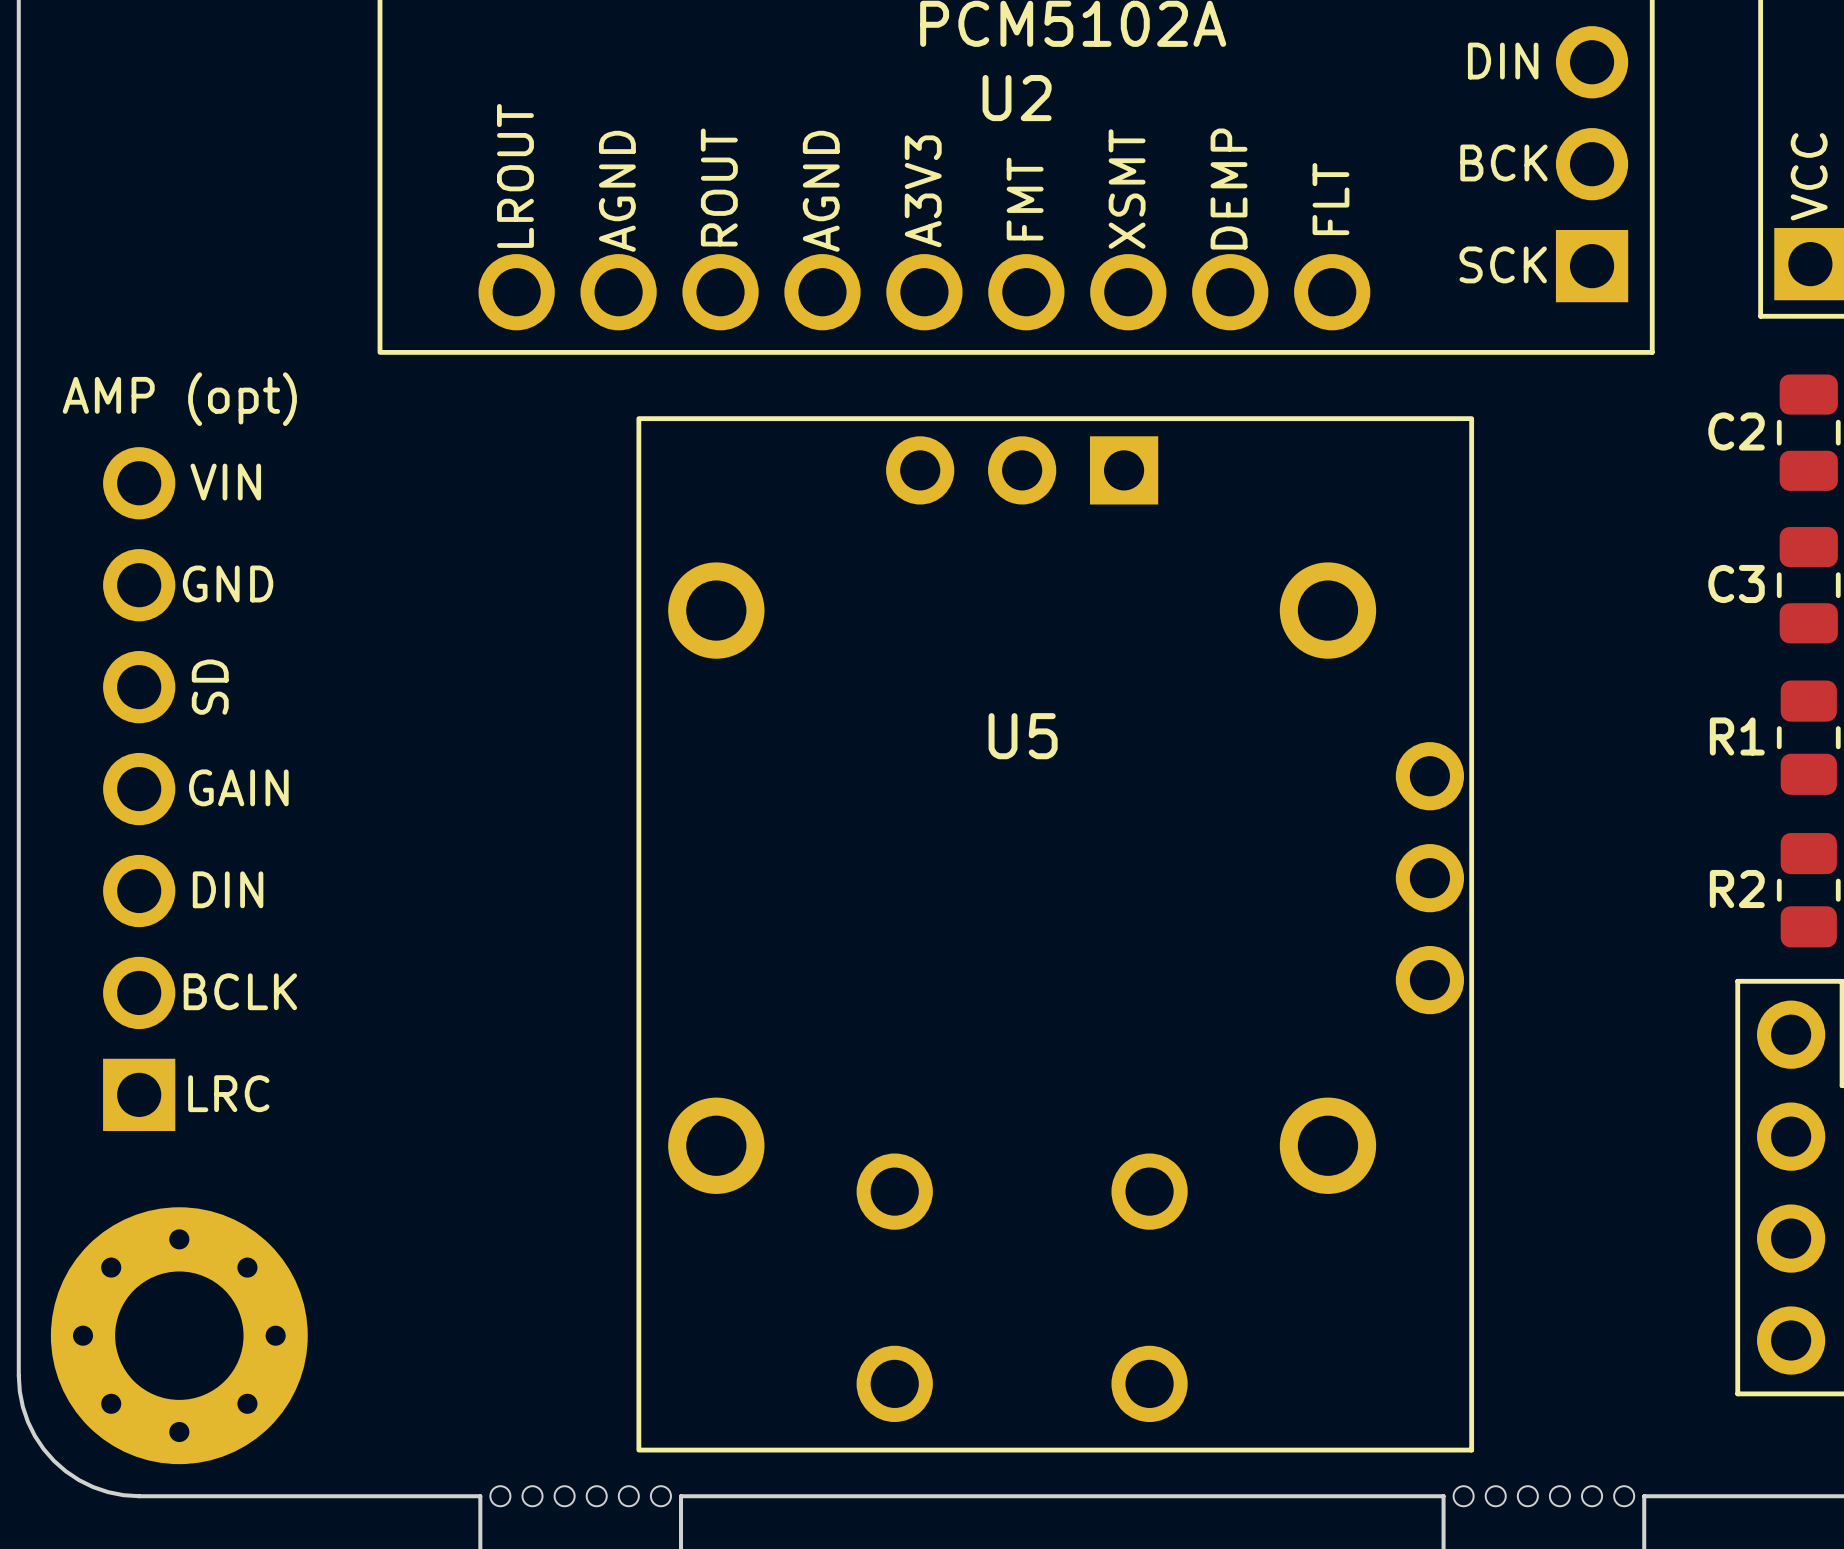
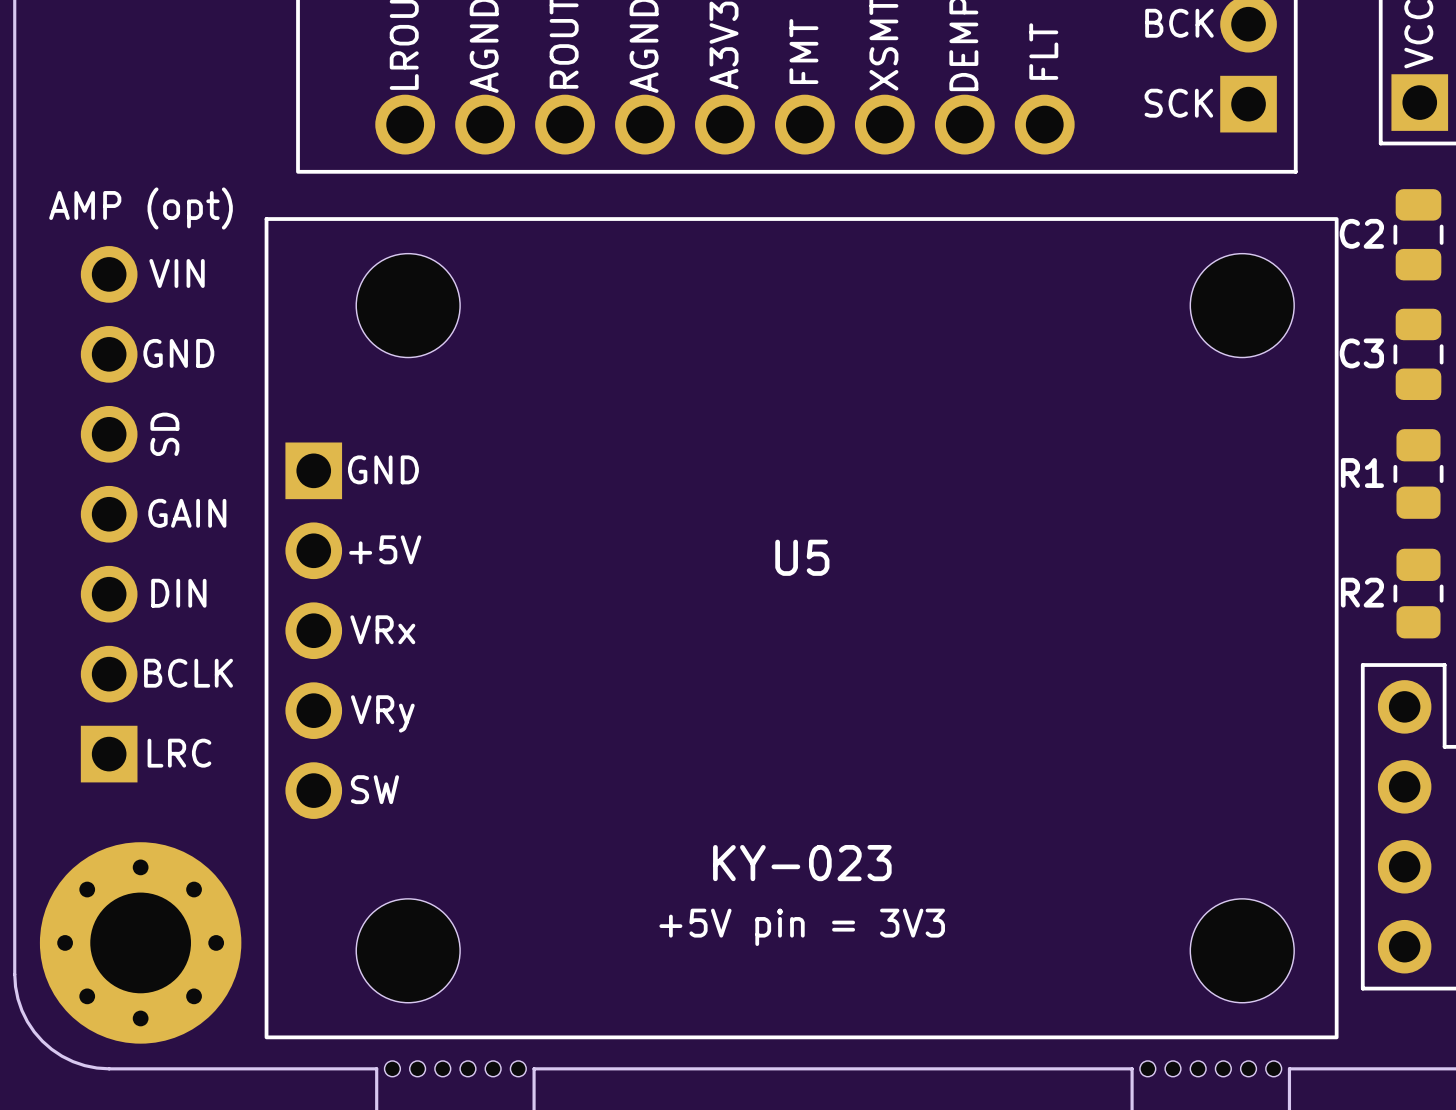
U5 footprint: [636, 416, 1475, 1453] -> [264, 217, 1339, 1040]
U5 name position: U5 (1023, 736) -> U5 (802, 557)

